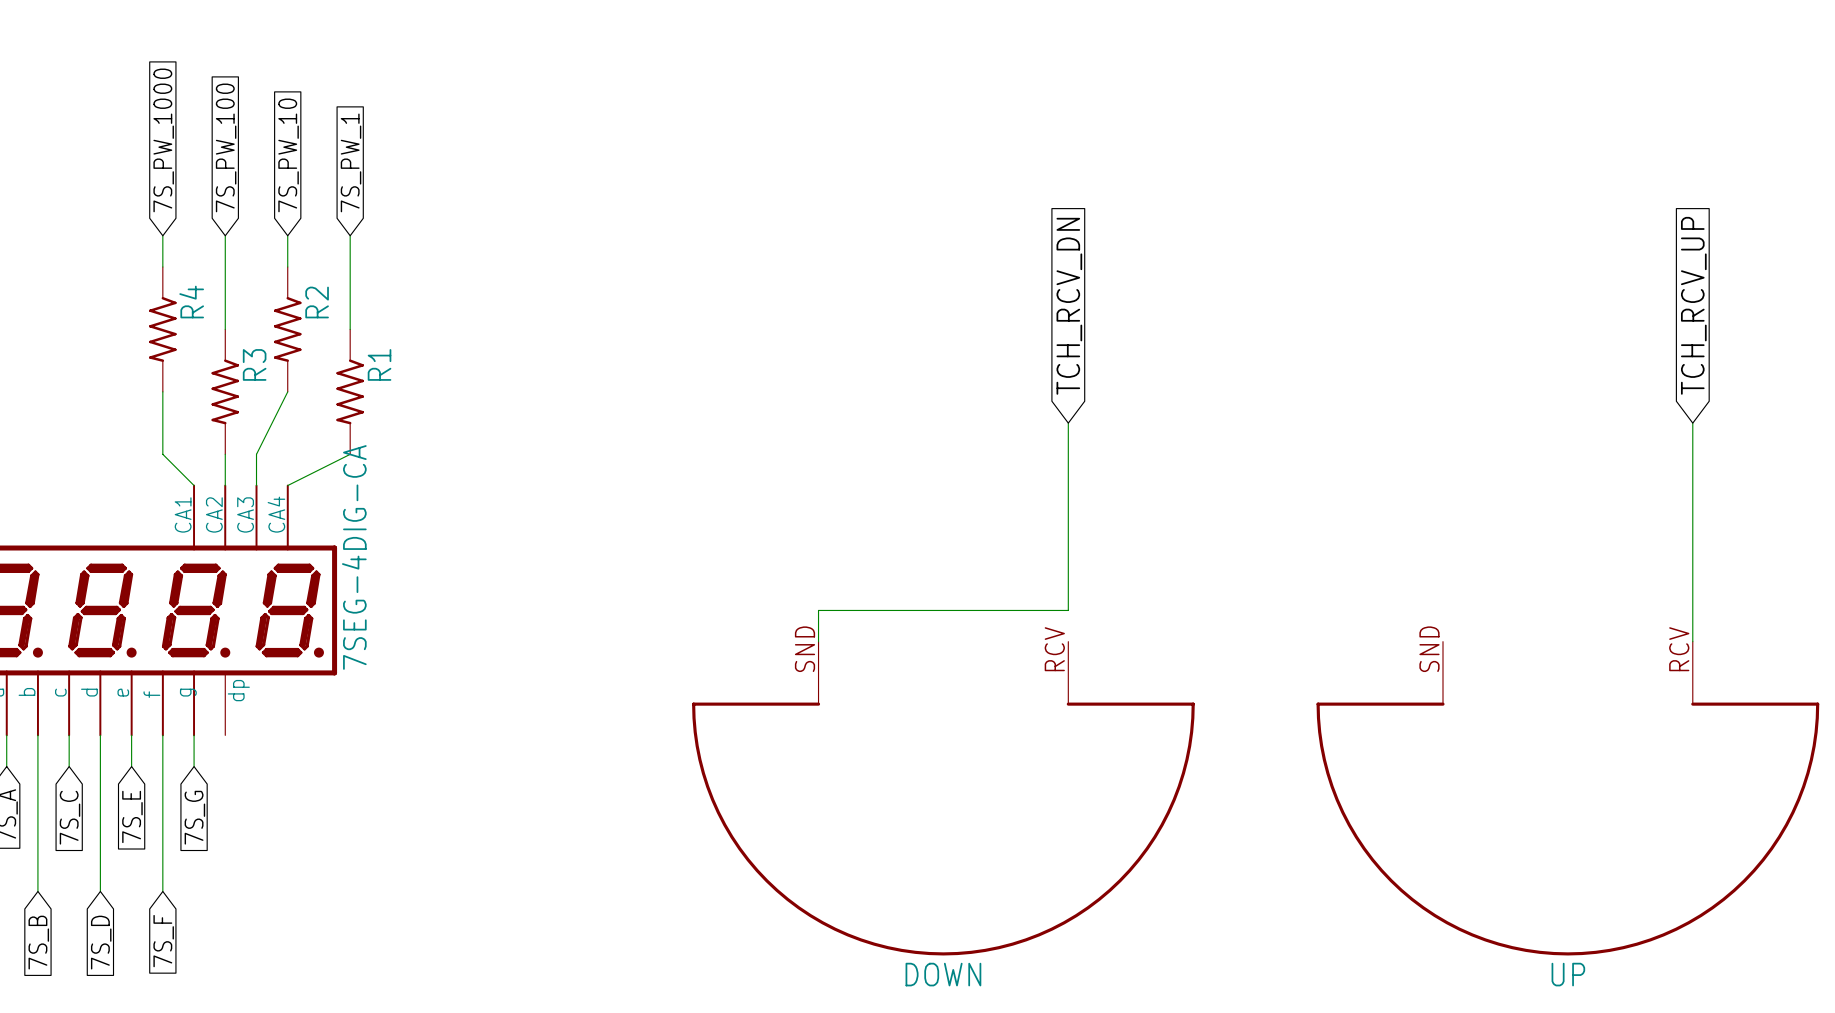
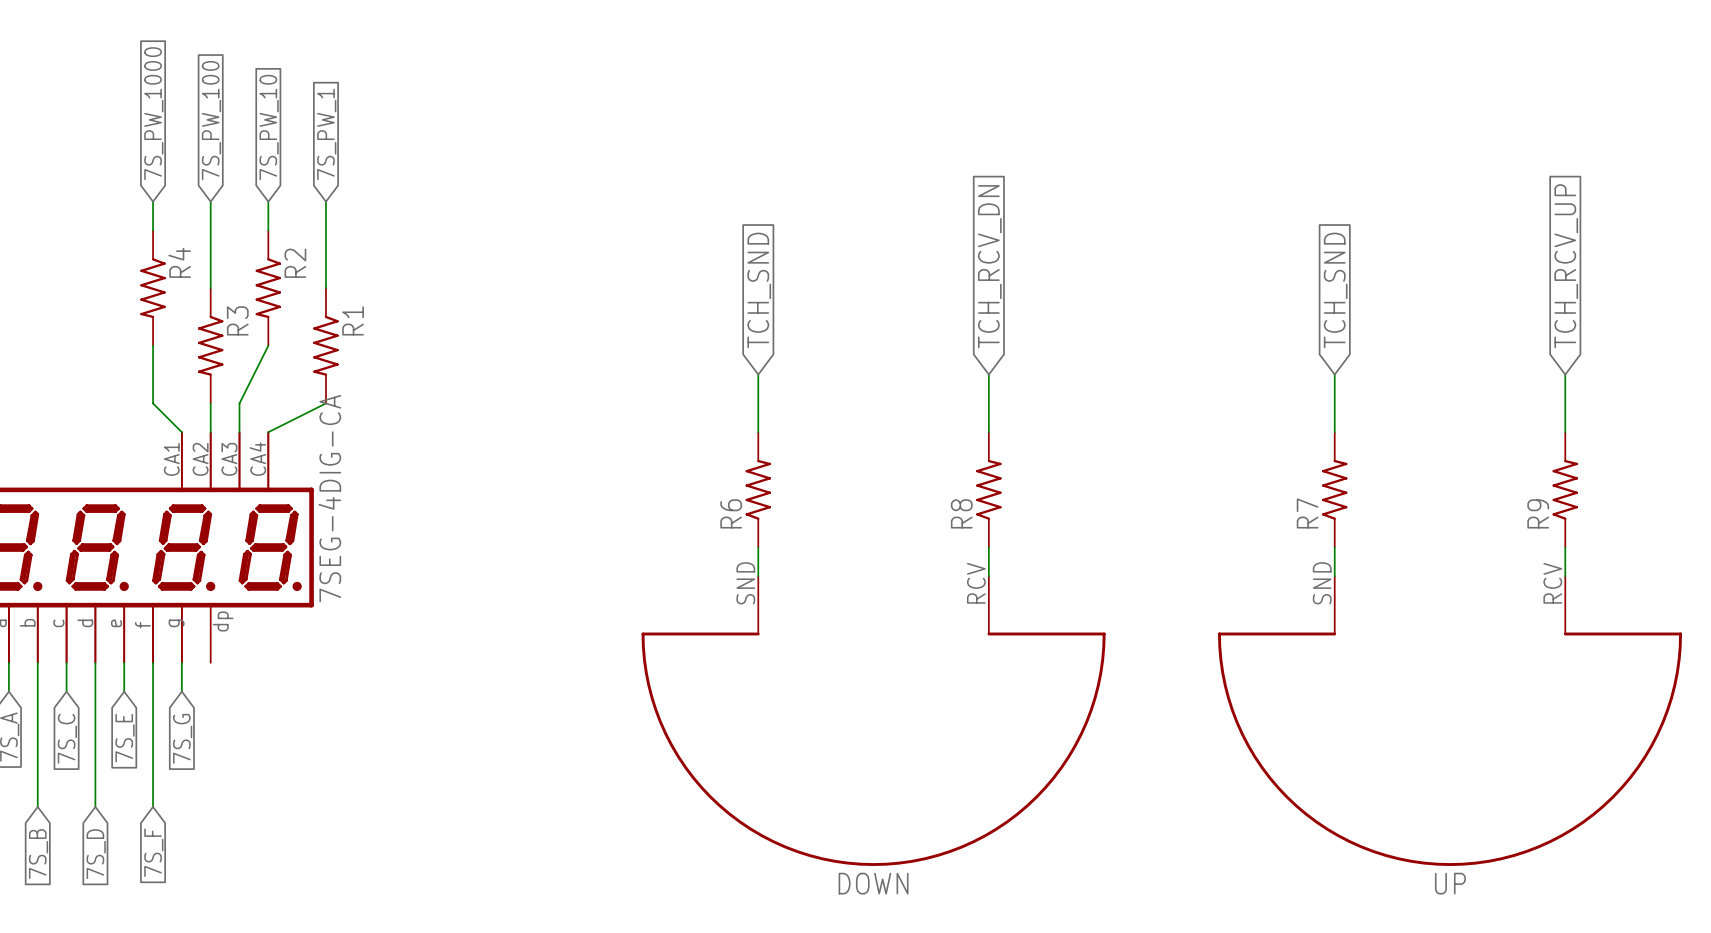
global label: none -> TCH_SND (759, 290)
global label: none -> TCH_SND (1335, 290)
wire: none -> (758, 374) (758, 432)
wire: none -> (1334, 374) (1334, 432)
wire: (1068, 485) (1068, 610) (818, 610) -> none
R6: none -> (758, 489)
R8: none -> (988, 489)
R7: none -> (1334, 489)
R9: none -> (1565, 489)
wire: none -> (988, 547) (988, 576)
wire: none -> (1334, 547) (1334, 576)

